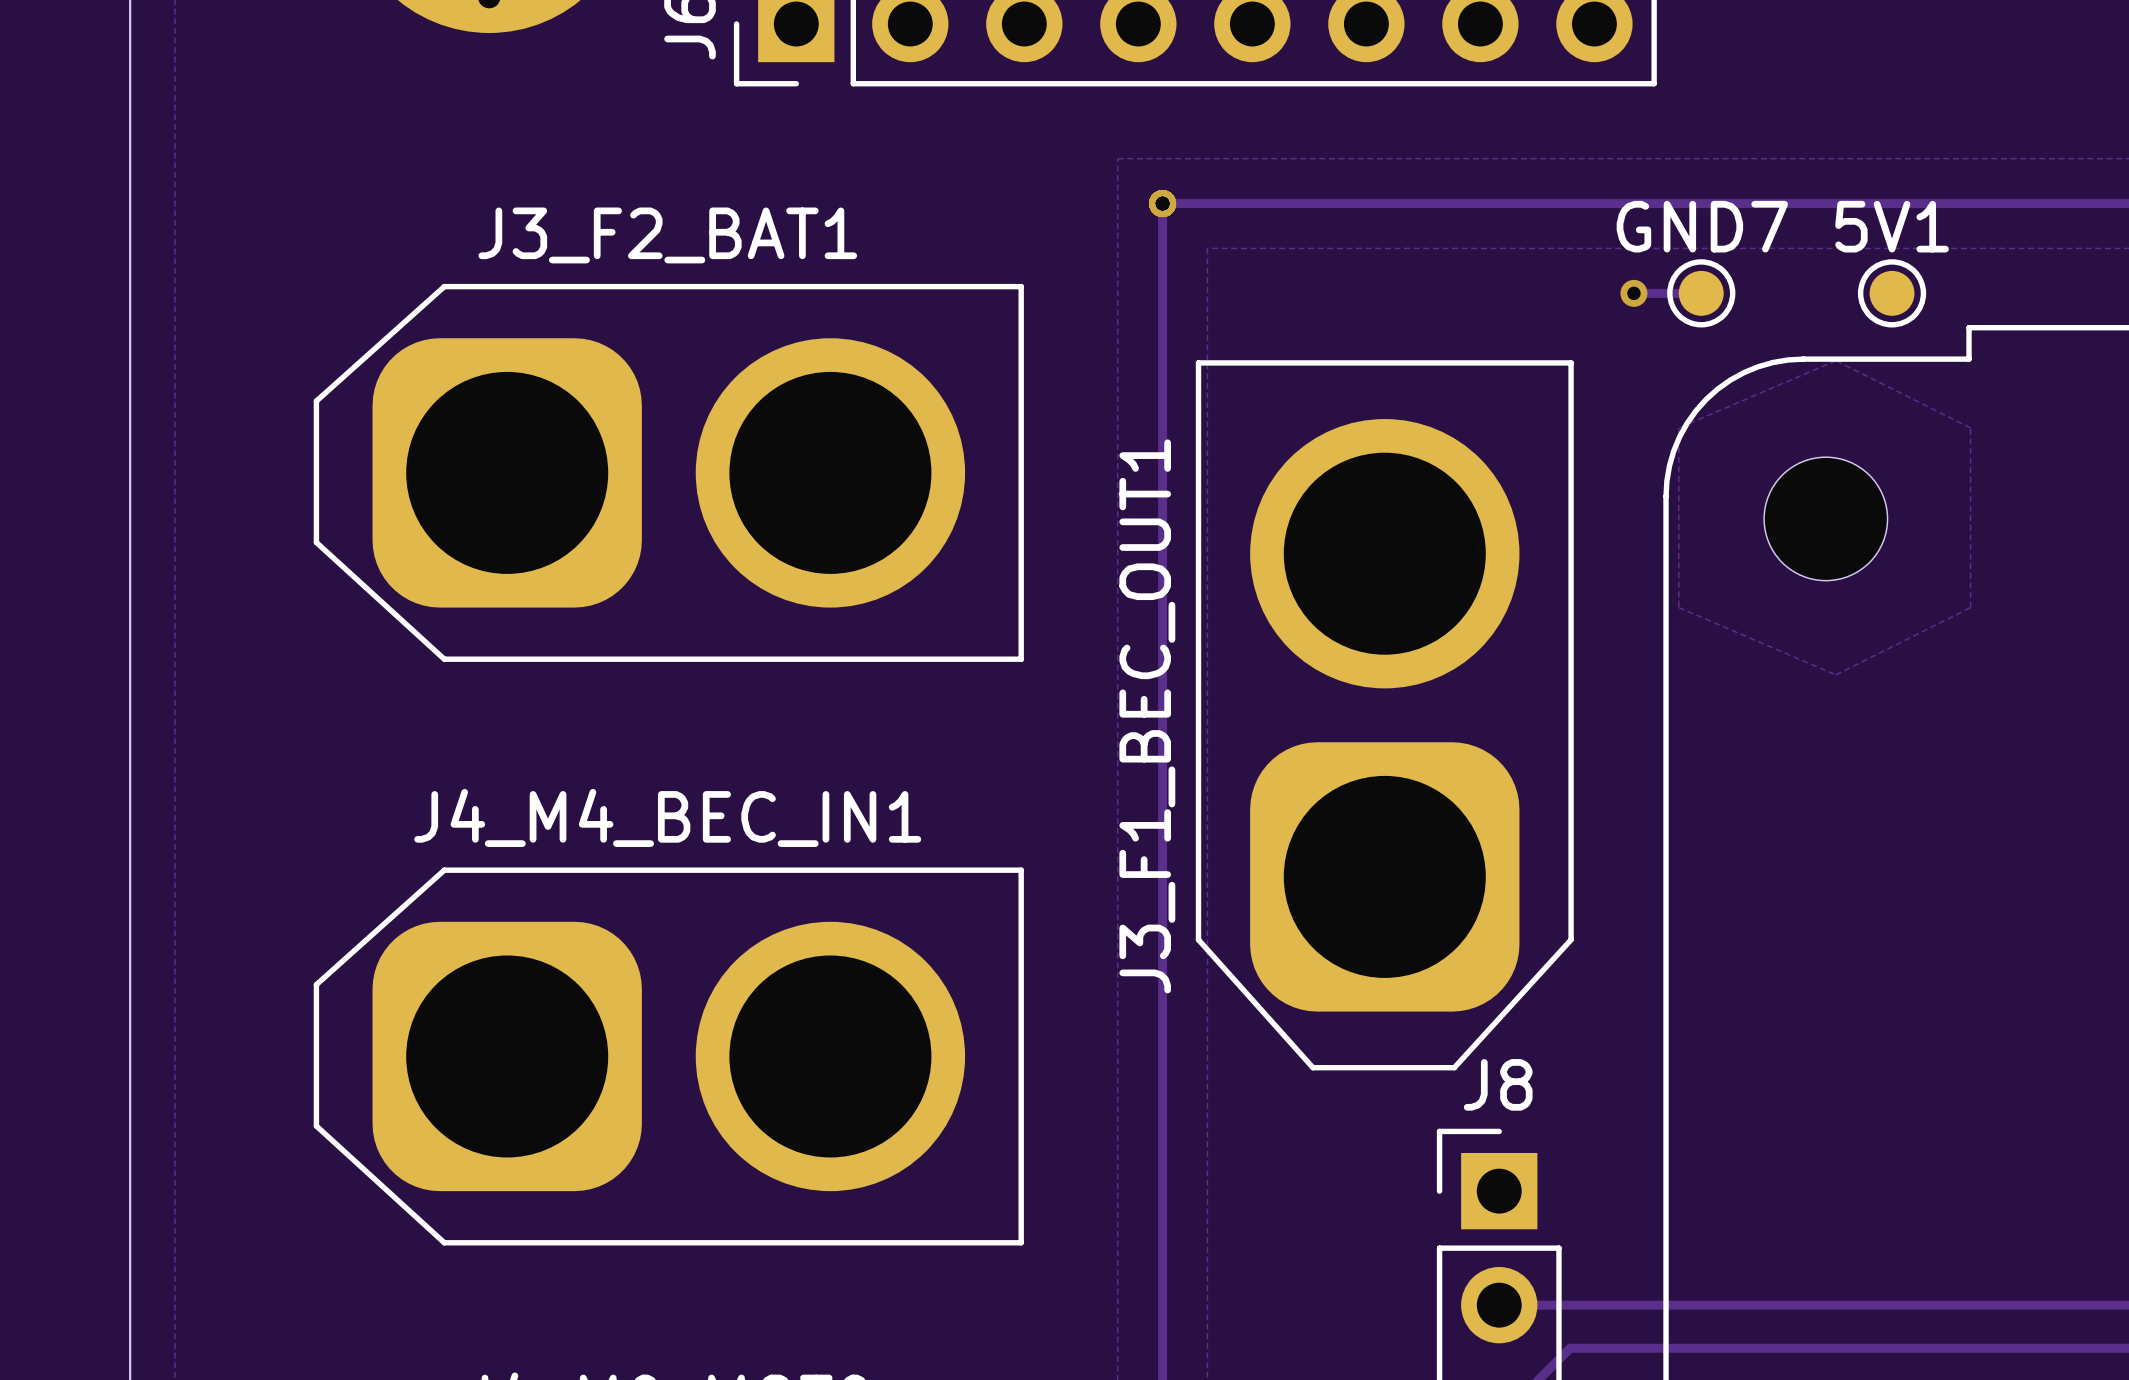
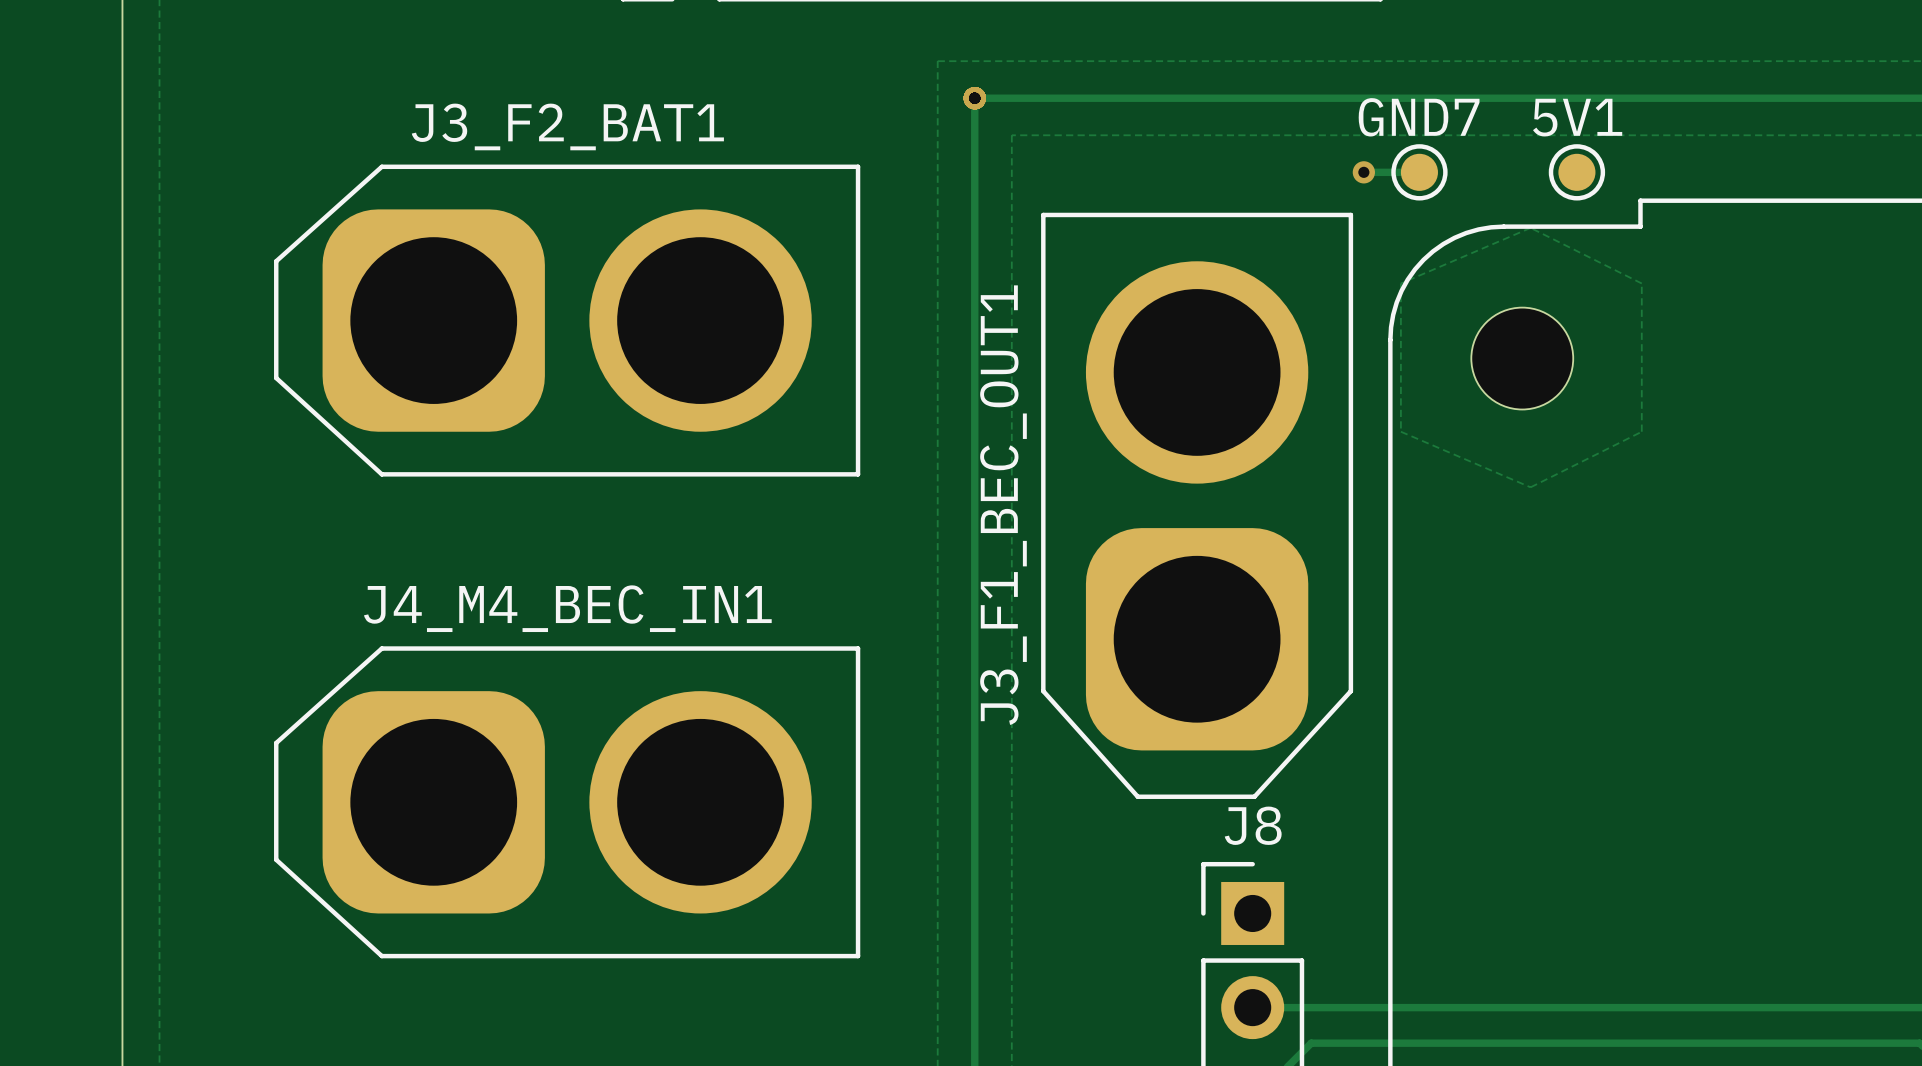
J3_F1_BEC_OUT1 position: (1384, 715) -> (1197, 505)

